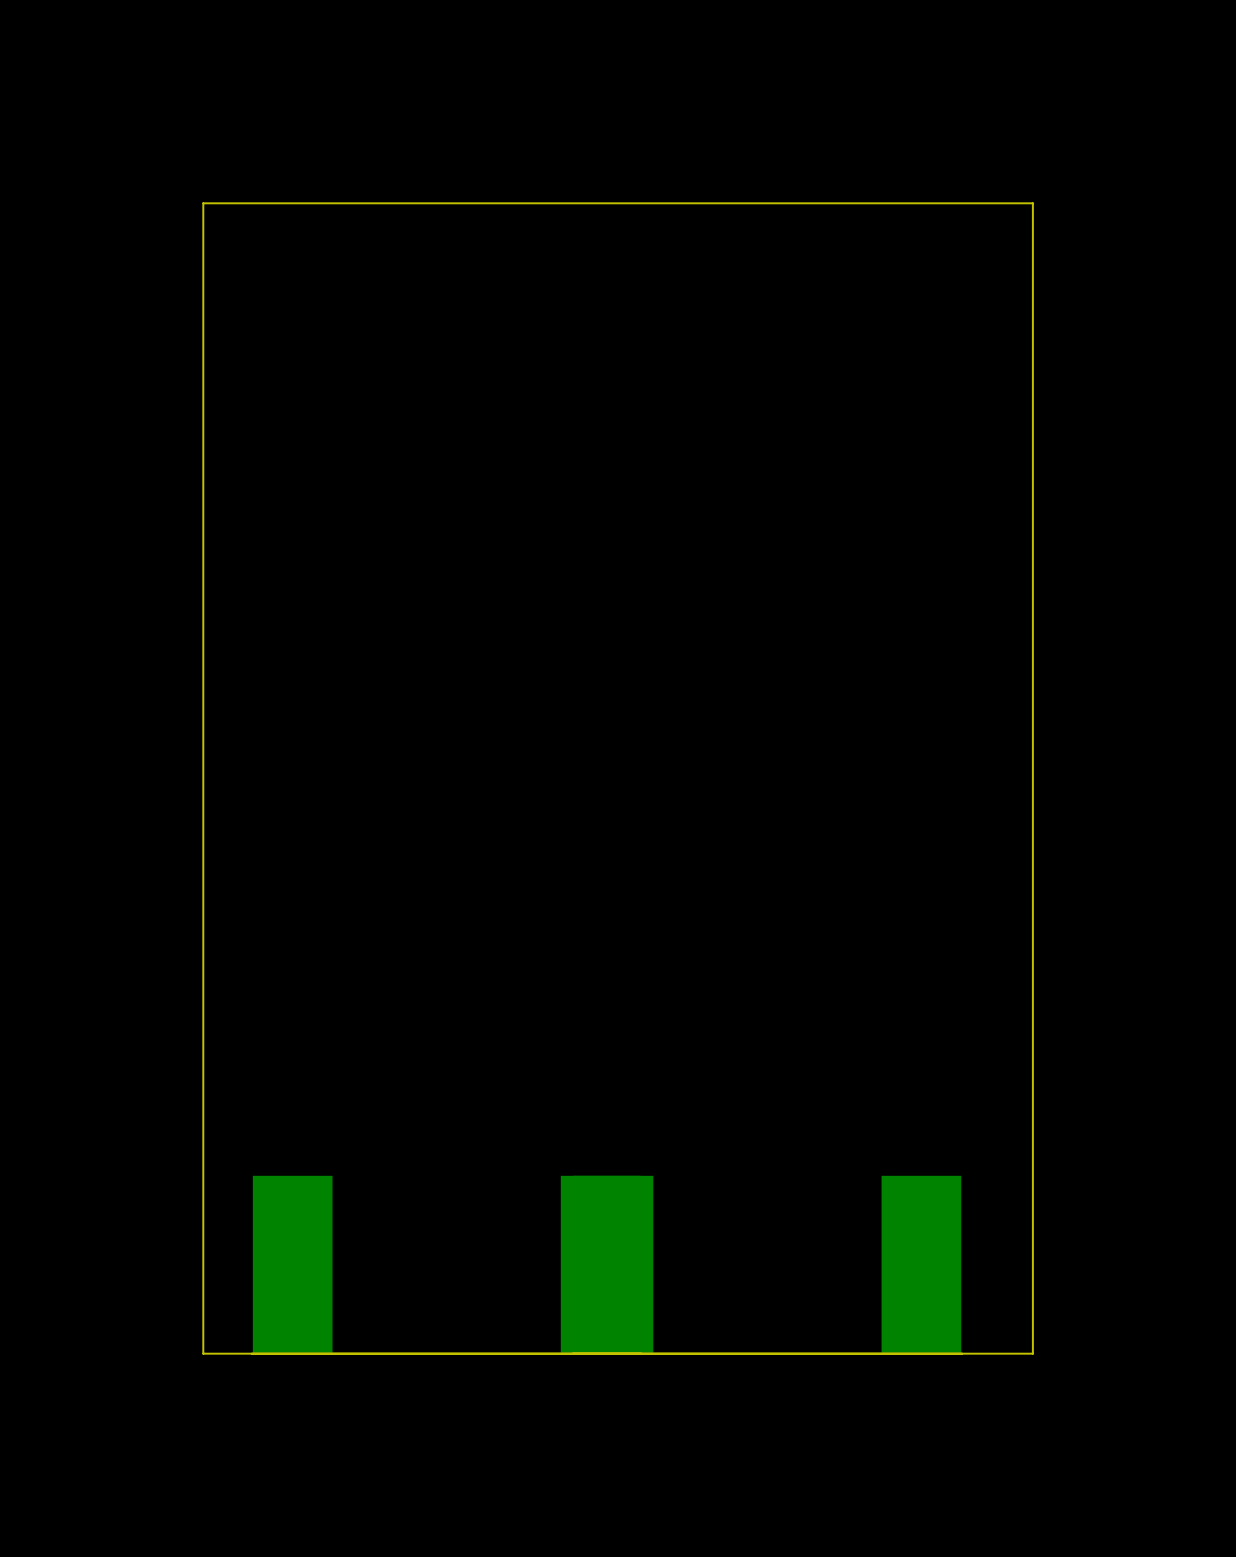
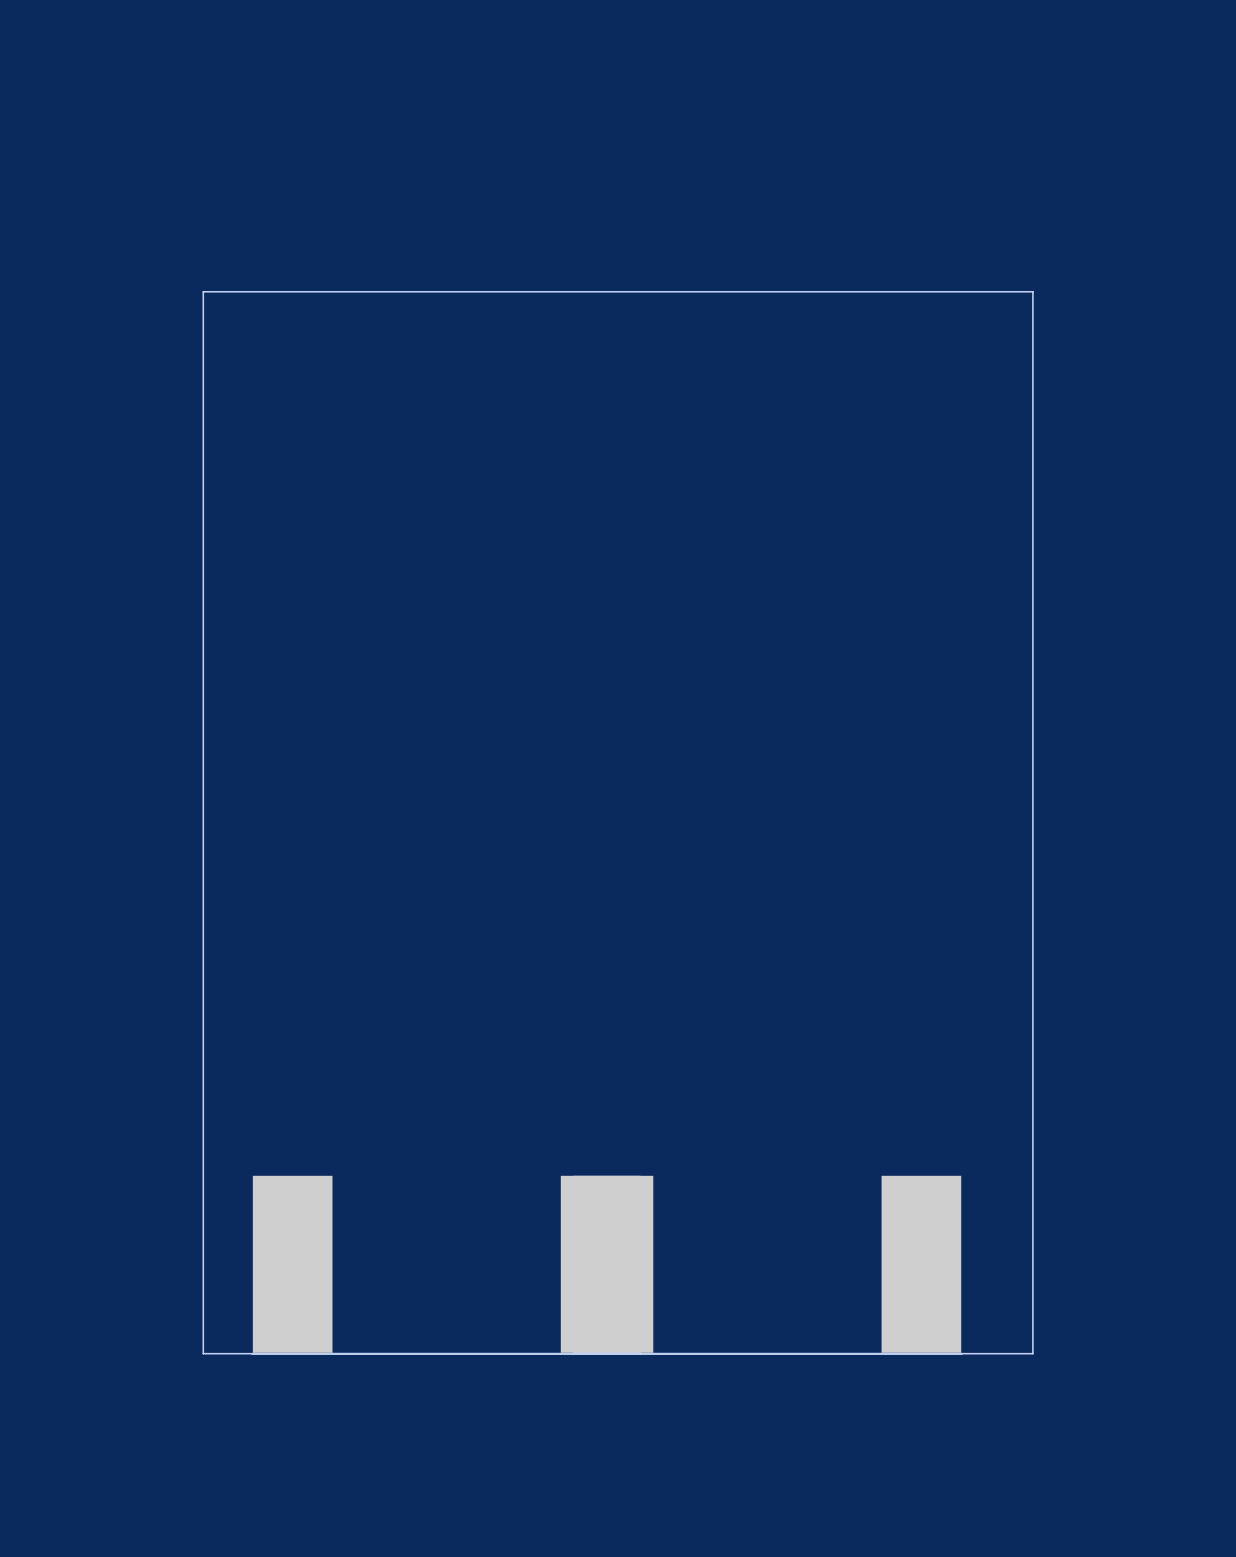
board edge: (1032, 291) (1032, 203) (203, 203) (203, 291) -> (1032, 291) (203, 291)

